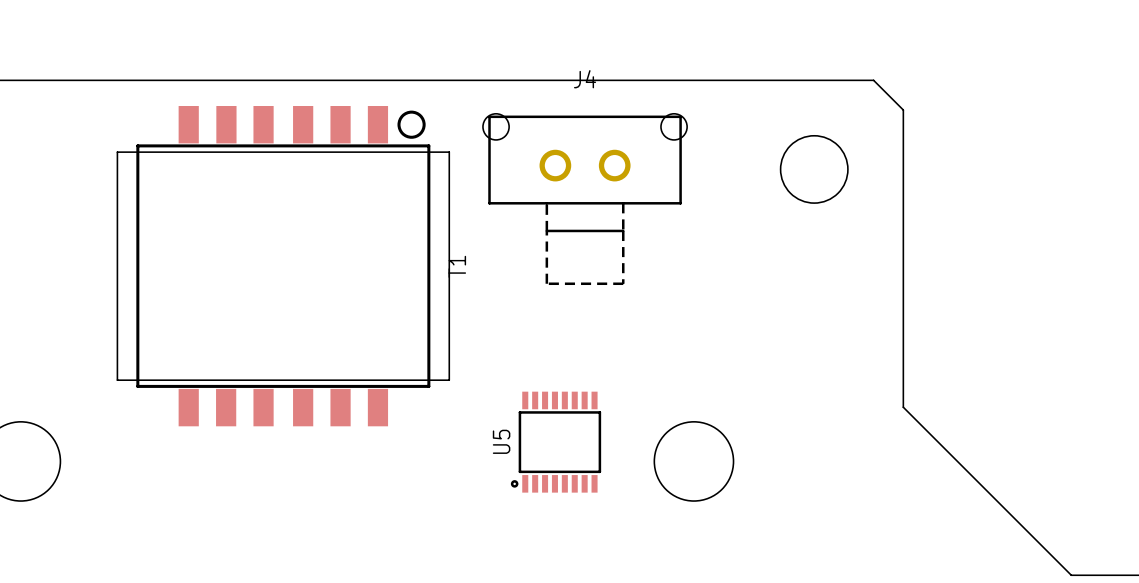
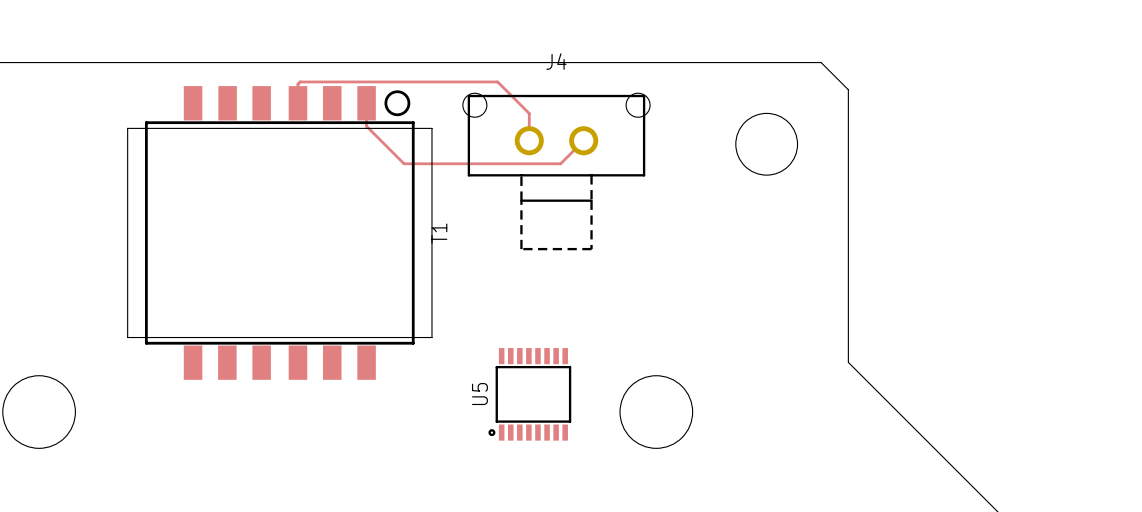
top track: none -> (297, 103) (297, 84) (300, 81) (497, 81) (529, 113) (529, 140)
top track: none -> (366, 103) (366, 126) (404, 163) (560, 163) (583, 140)

